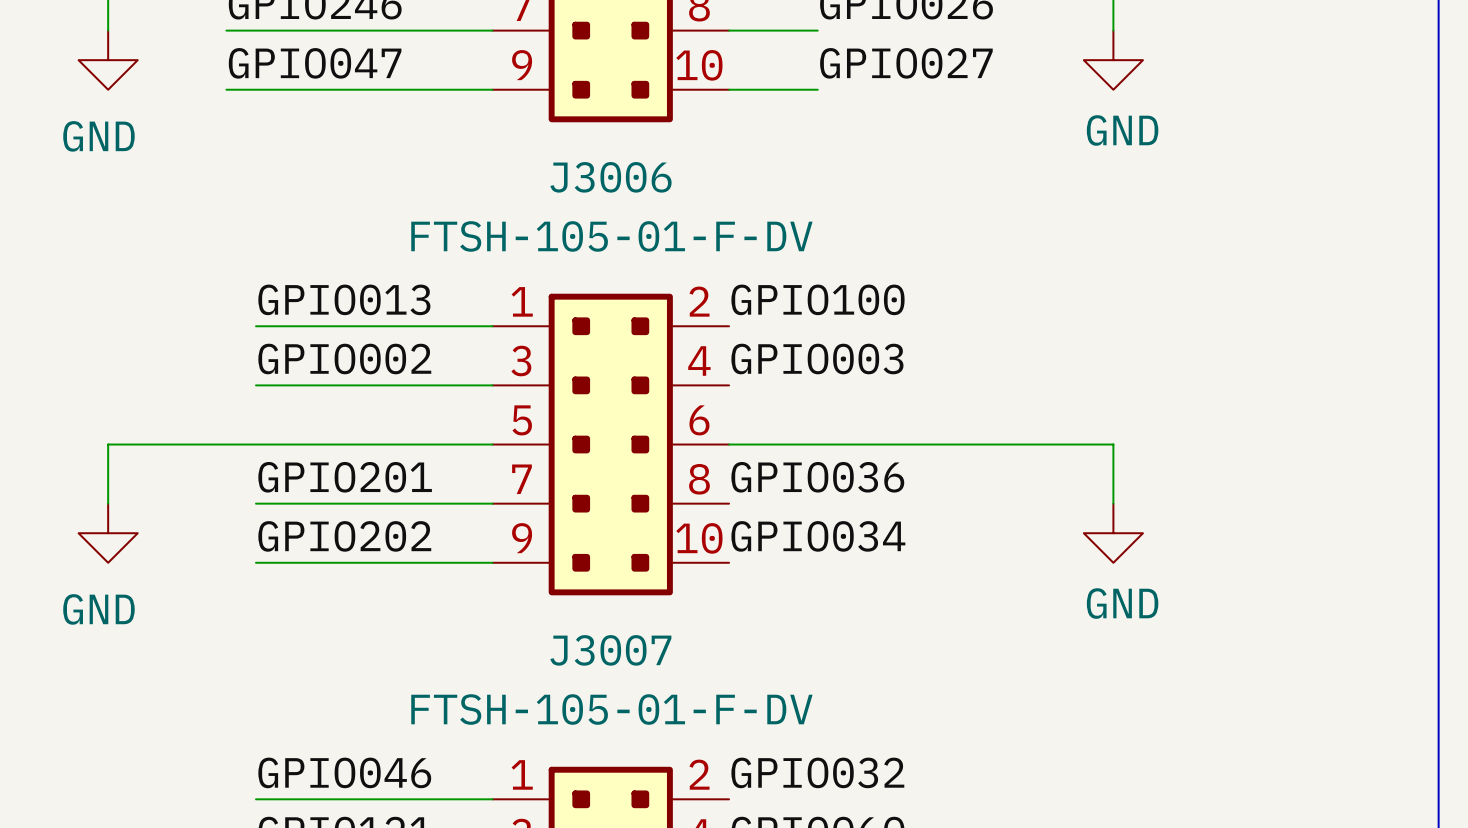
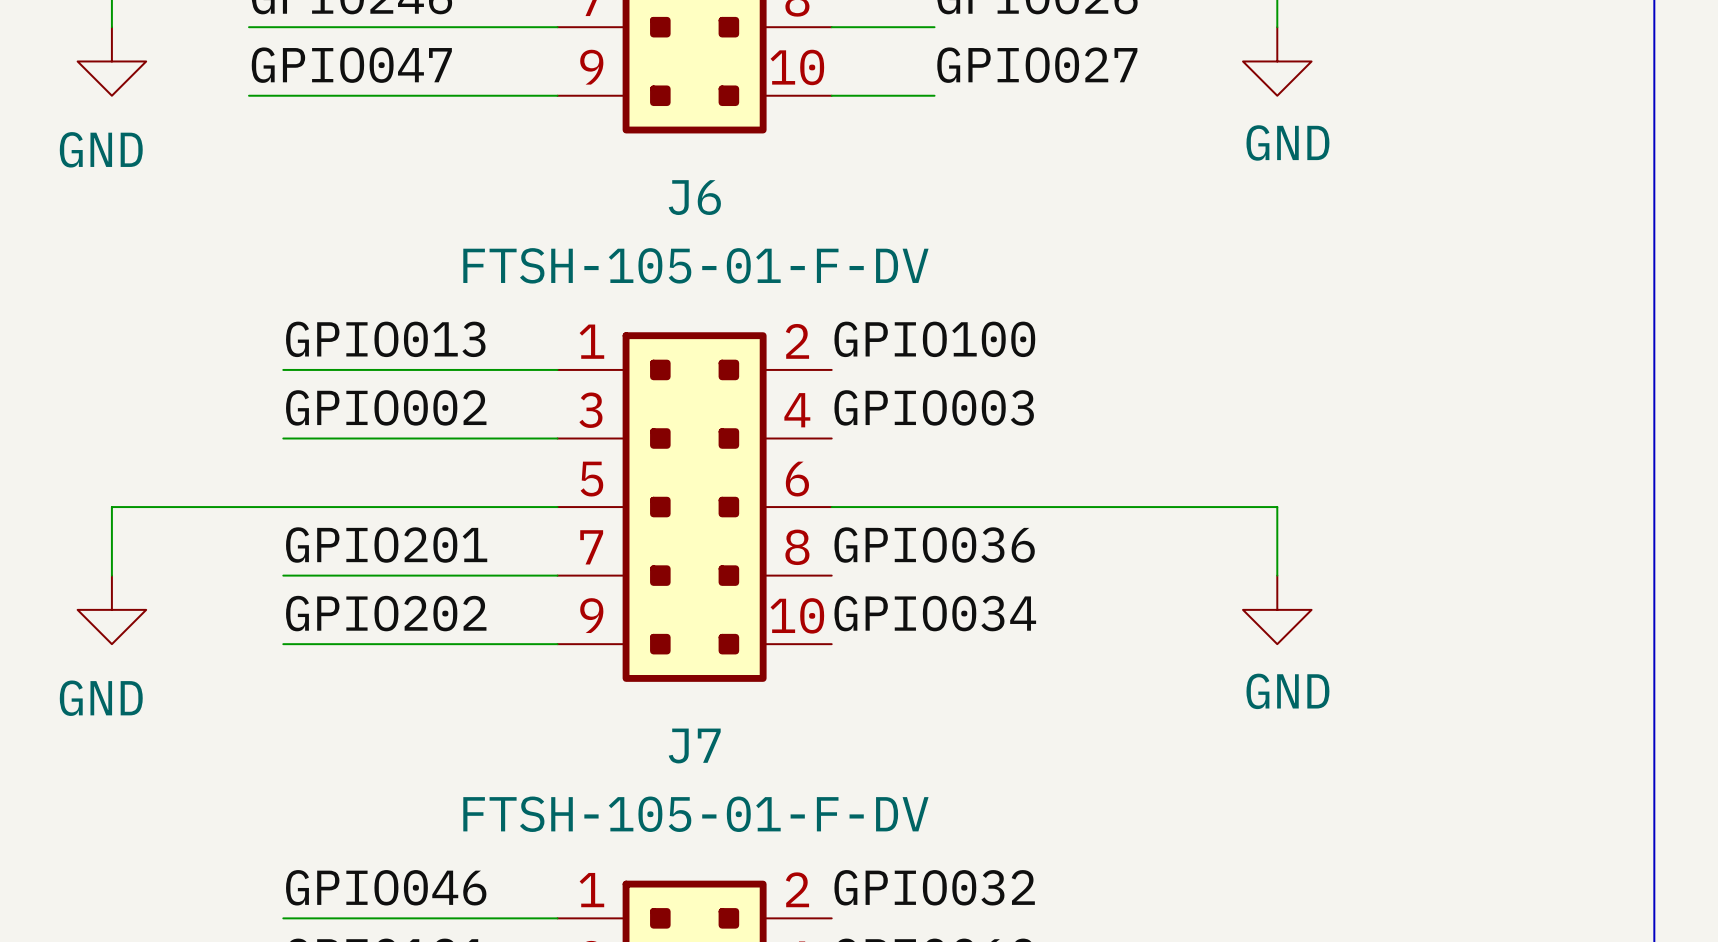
J3006 name: J3006 (610, 177) -> J6 (694, 197)
J3007 name: J3007 (610, 650) -> J7 (694, 745)

